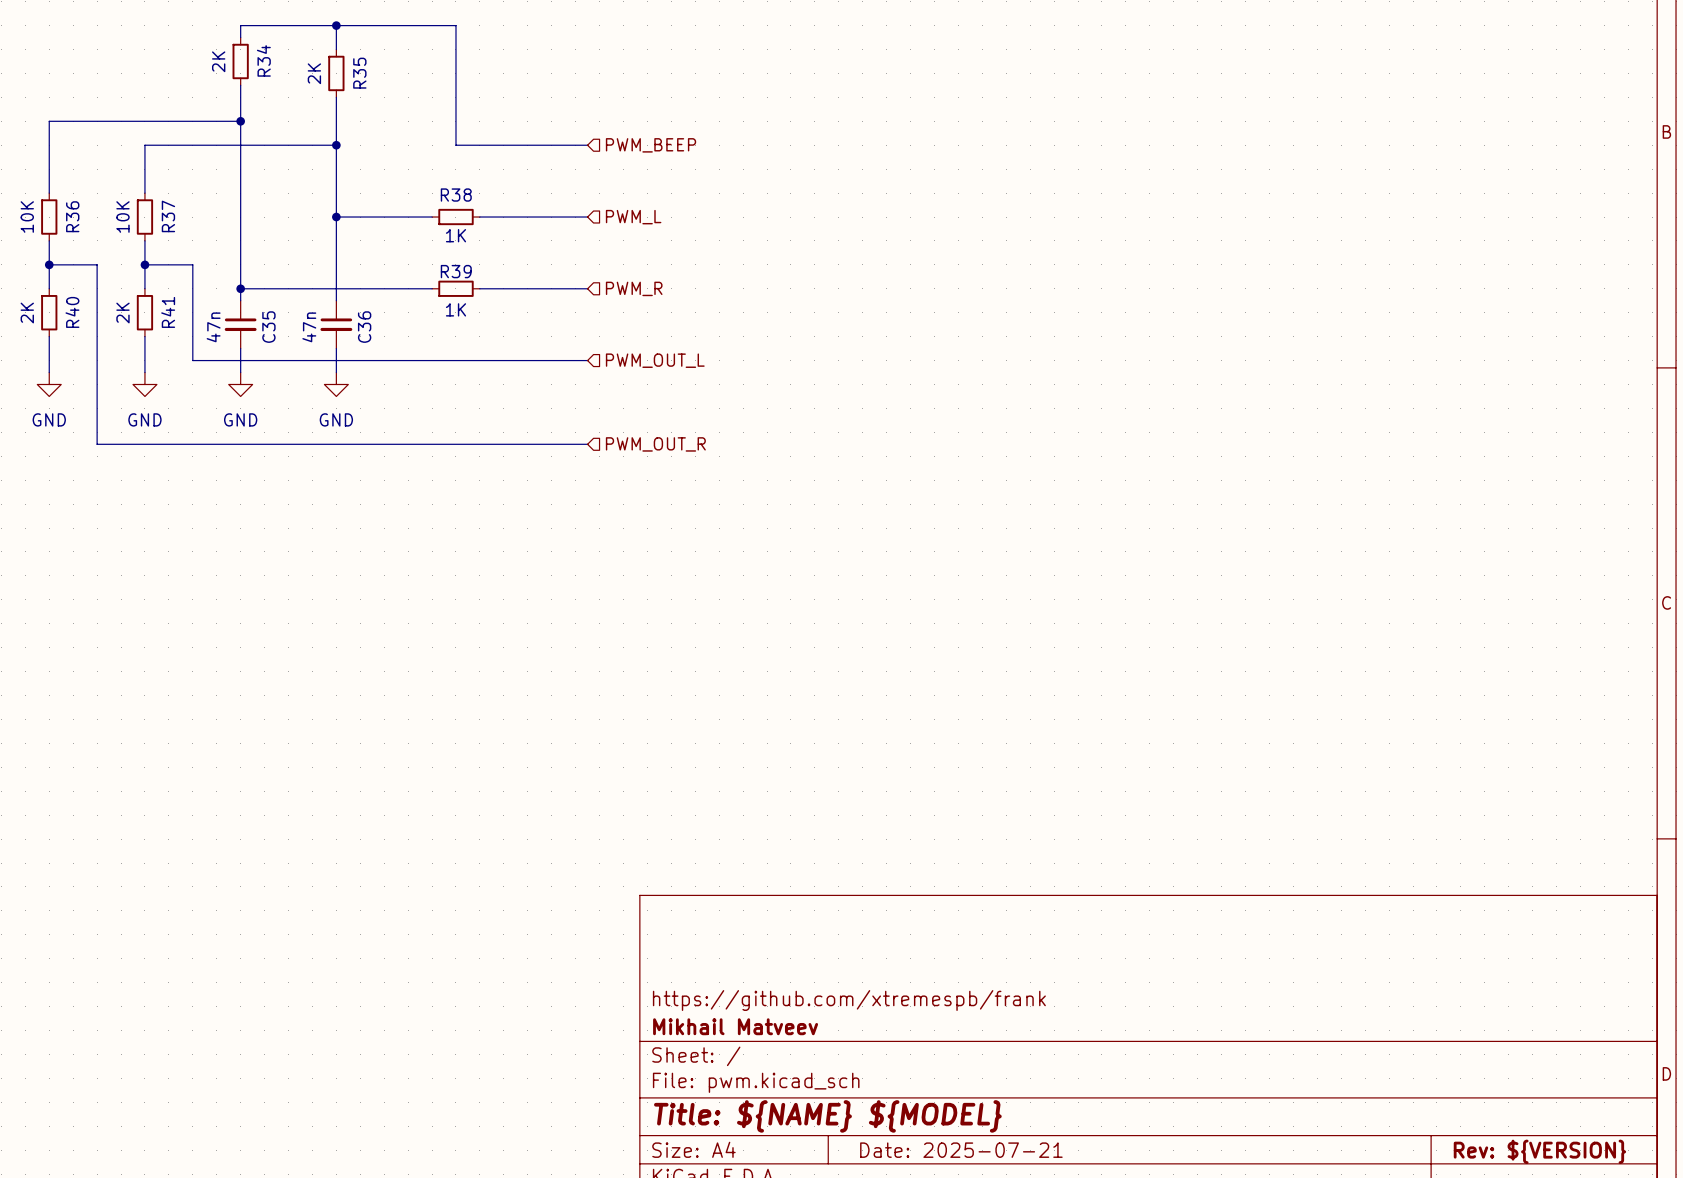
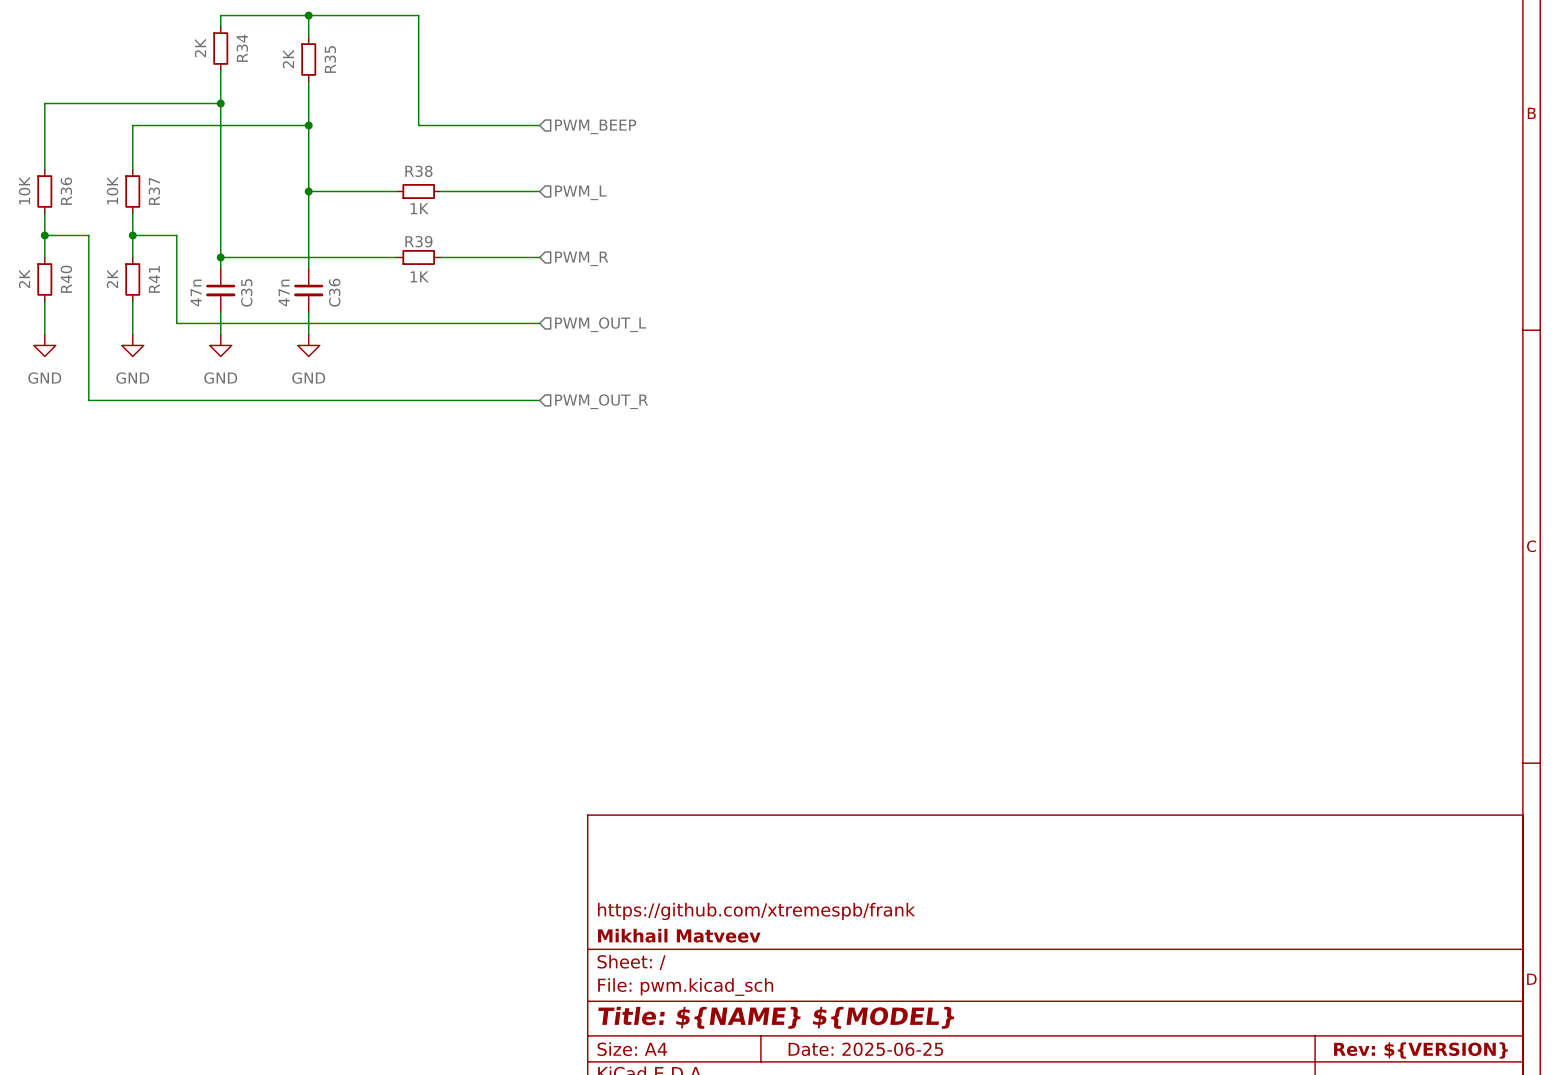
title block: Date: 2025-07-21 (961, 1150) -> Date: 2025-06-25 (865, 1049)

